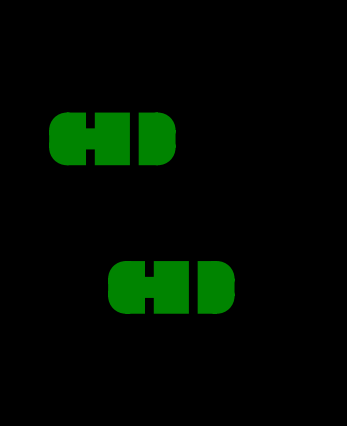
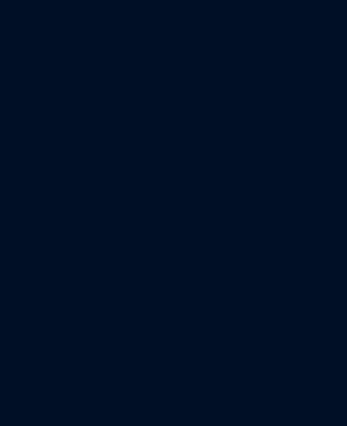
part: (112, 138) -> none
part: (171, 287) -> none

